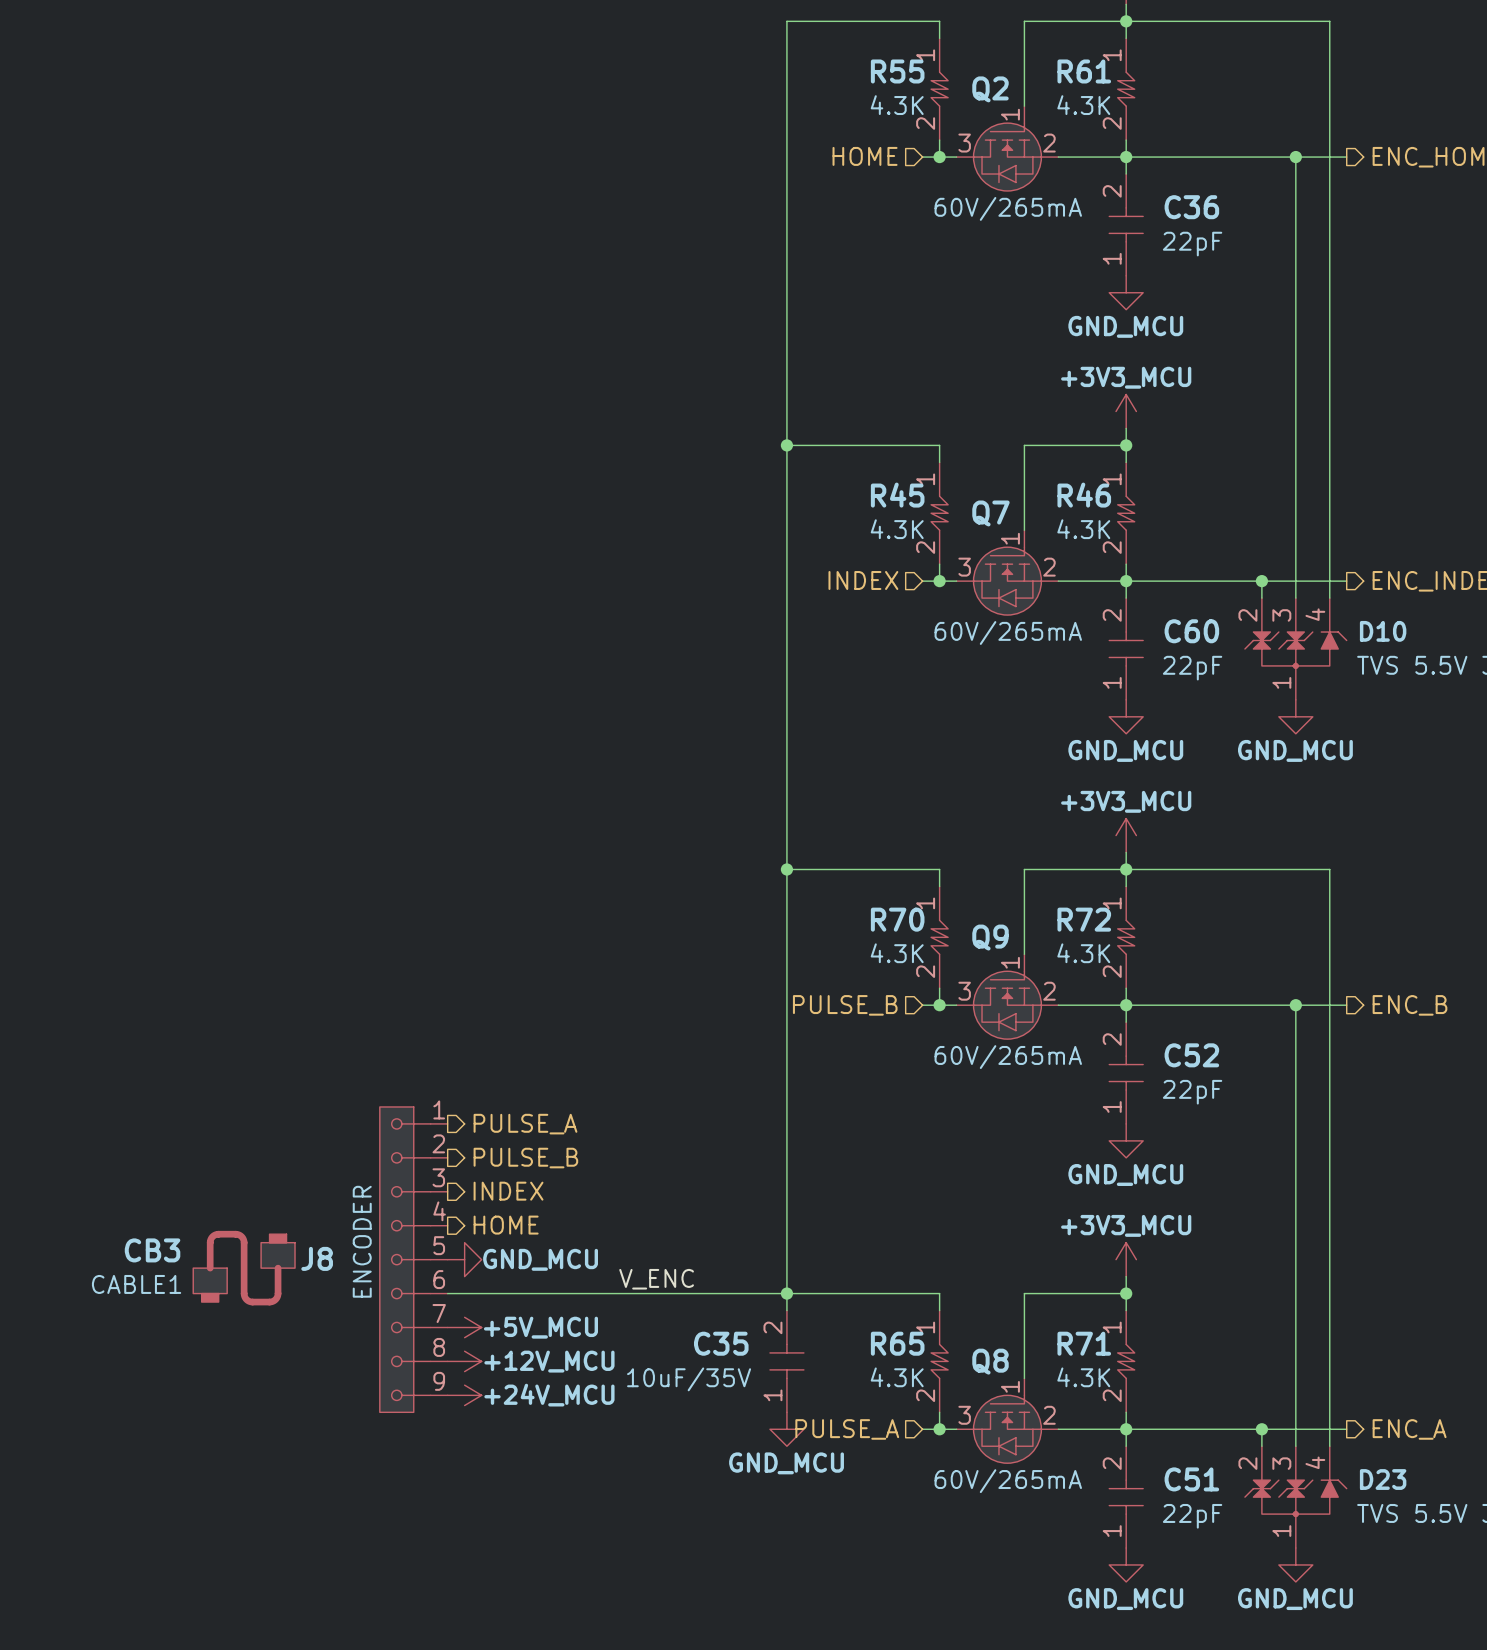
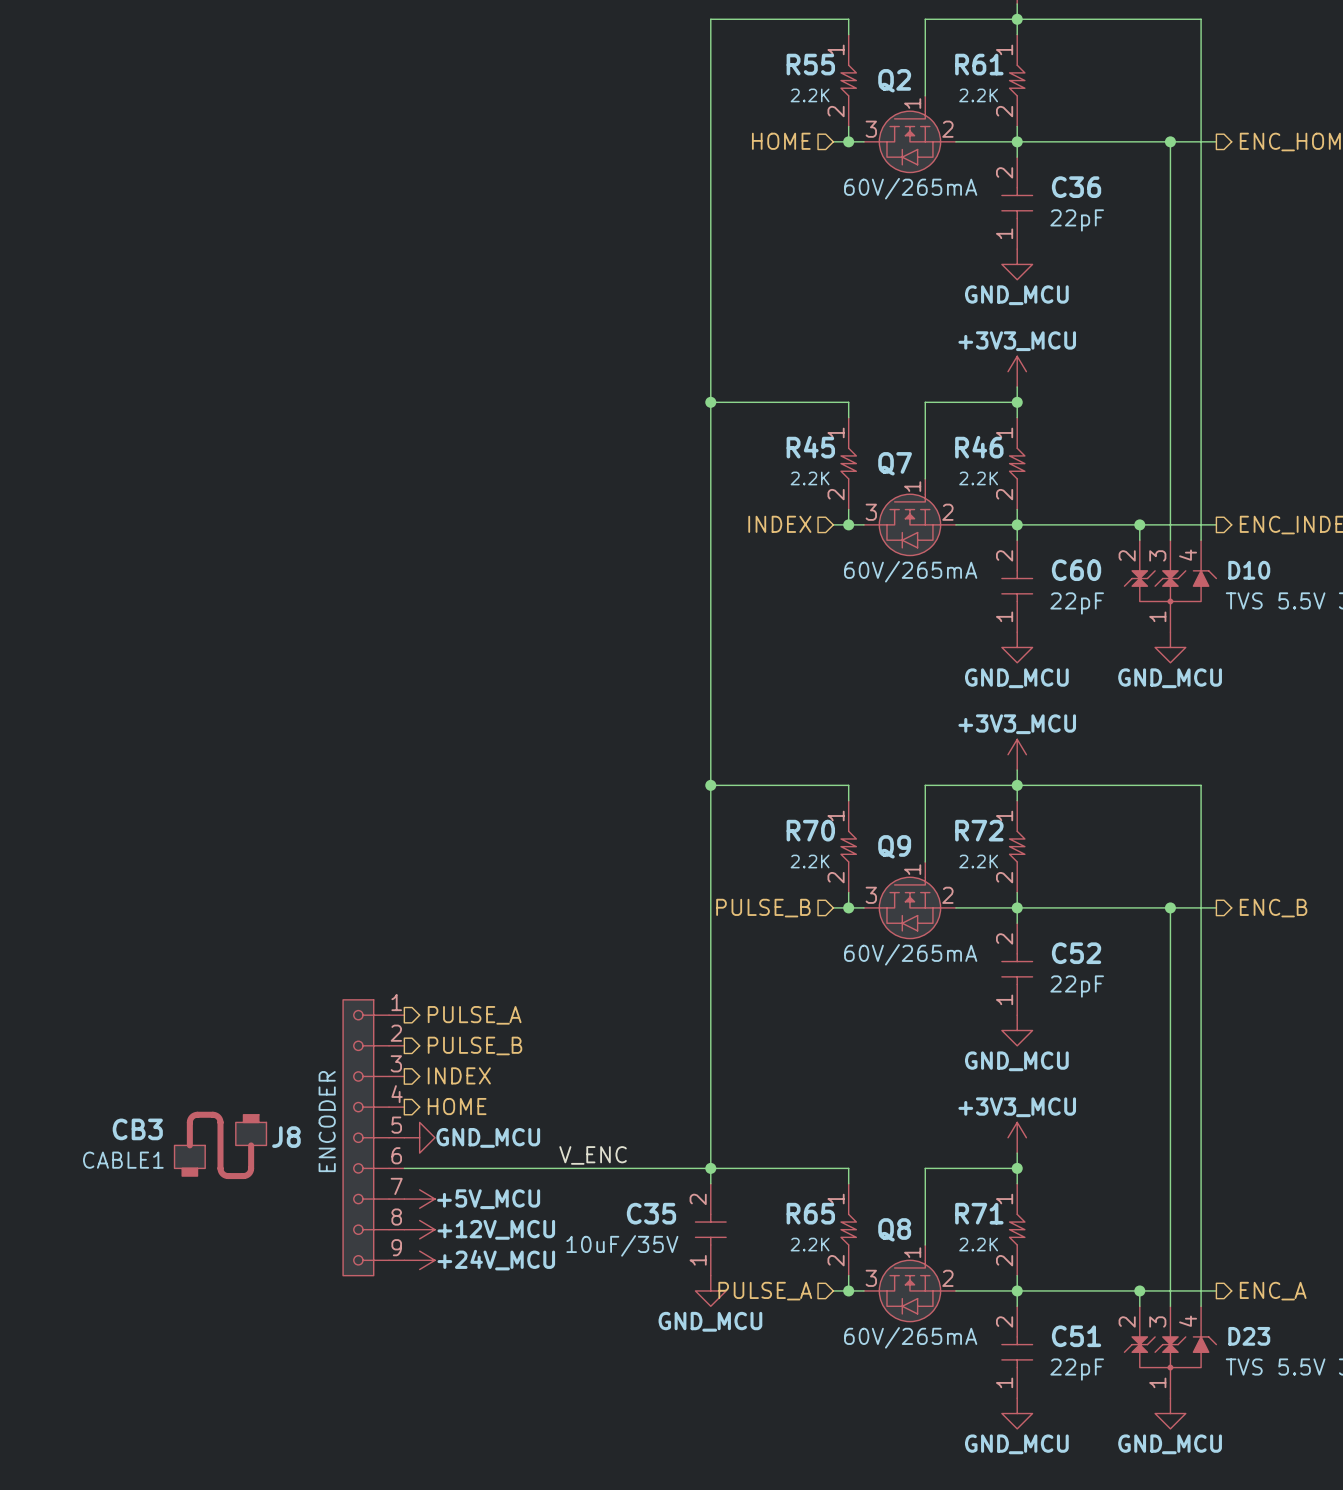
R55 value: 4.3K (897, 105) -> 2.2K (810, 95)
R61 value: 4.3K (1083, 105) -> 2.2K (978, 95)
R45 value: 4.3K (897, 529) -> 2.2K (810, 478)
R46 value: 4.3K (1083, 529) -> 2.2K (978, 478)
R70 value: 4.3K (897, 953) -> 2.2K (810, 861)
R72 value: 4.3K (1083, 953) -> 2.2K (978, 861)
R65 value: 4.3K (897, 1377) -> 2.2K (810, 1244)
R71 value: 4.3K (1083, 1377) -> 2.2K (978, 1244)

